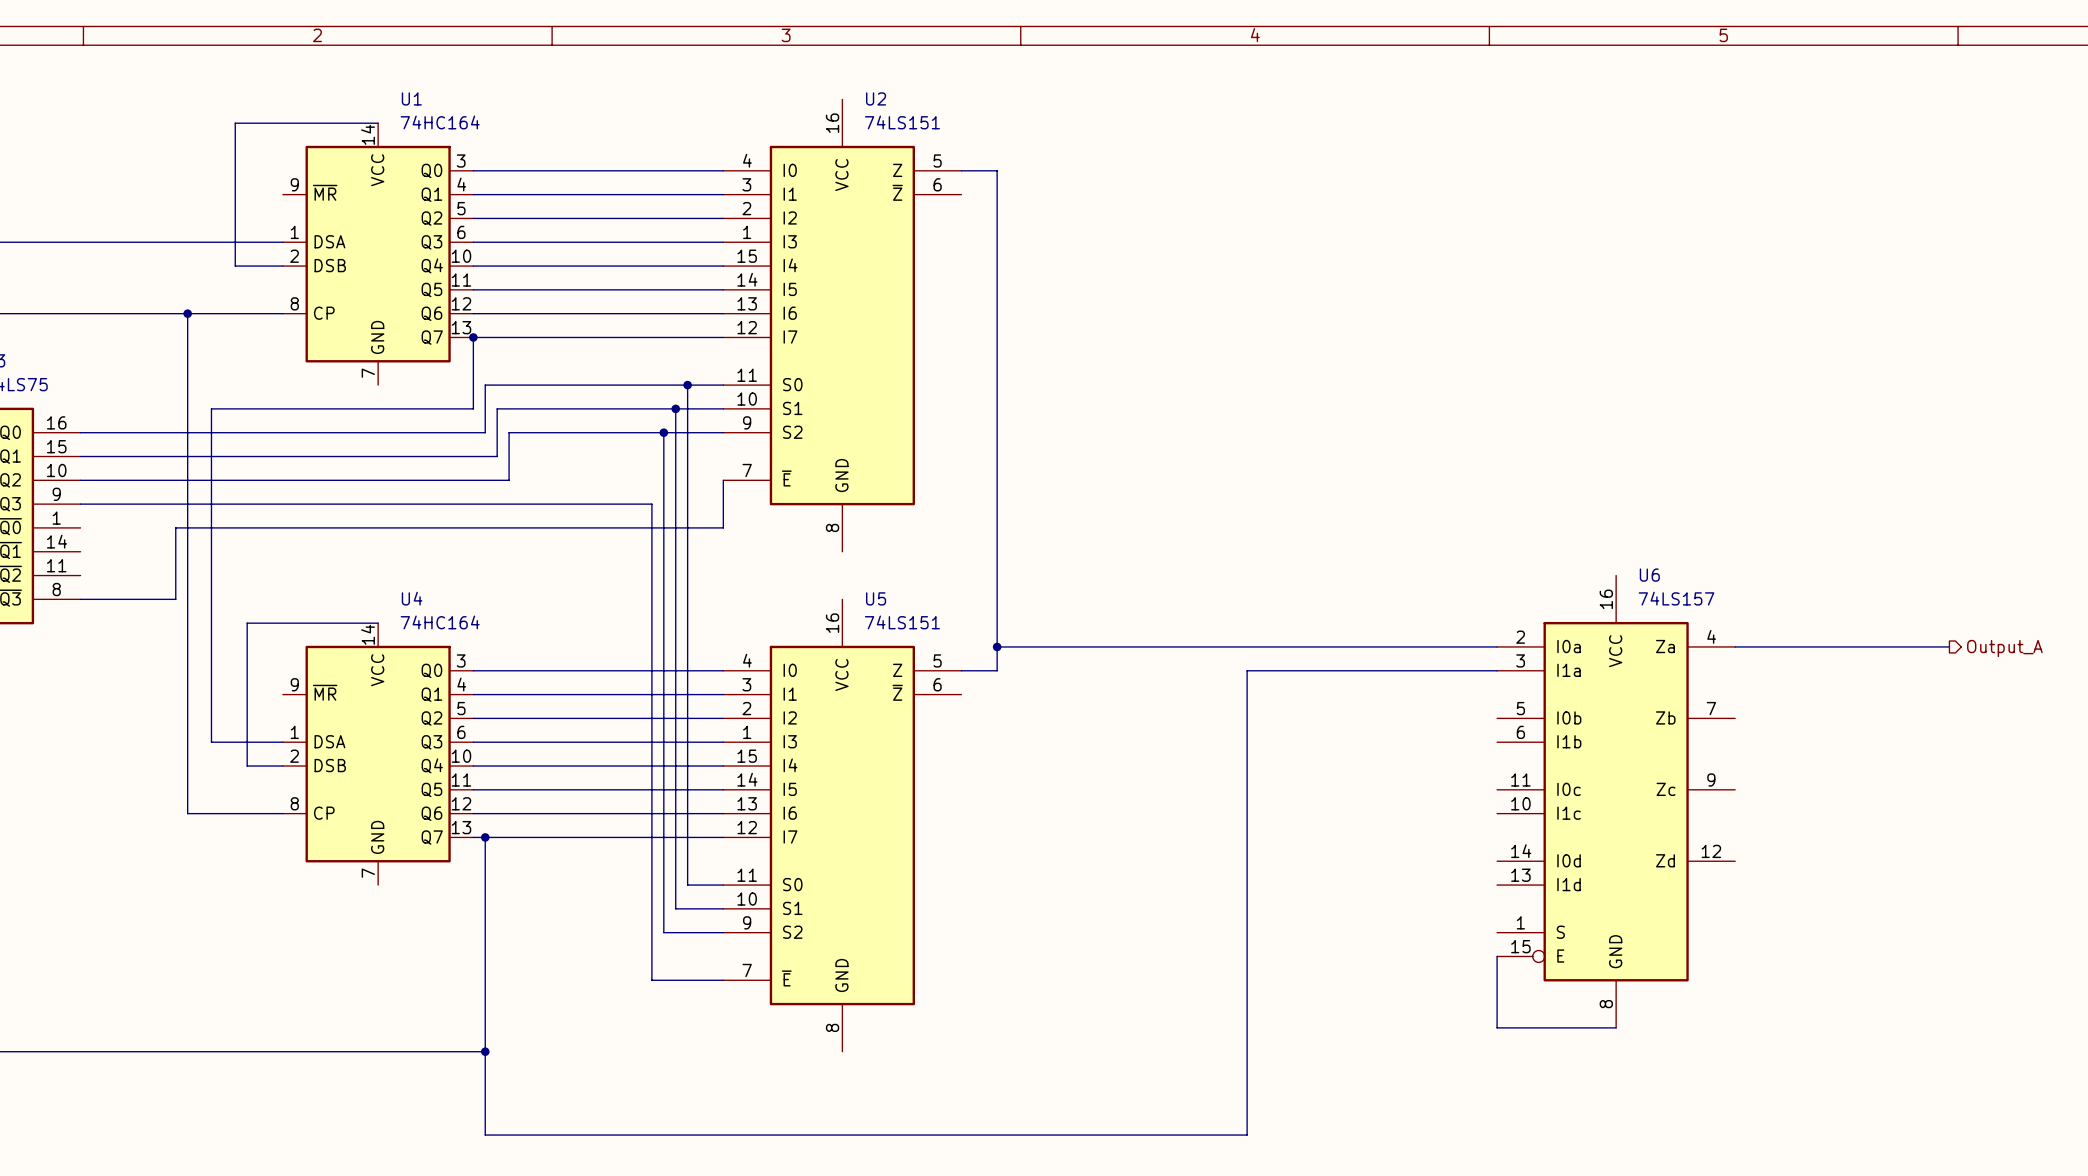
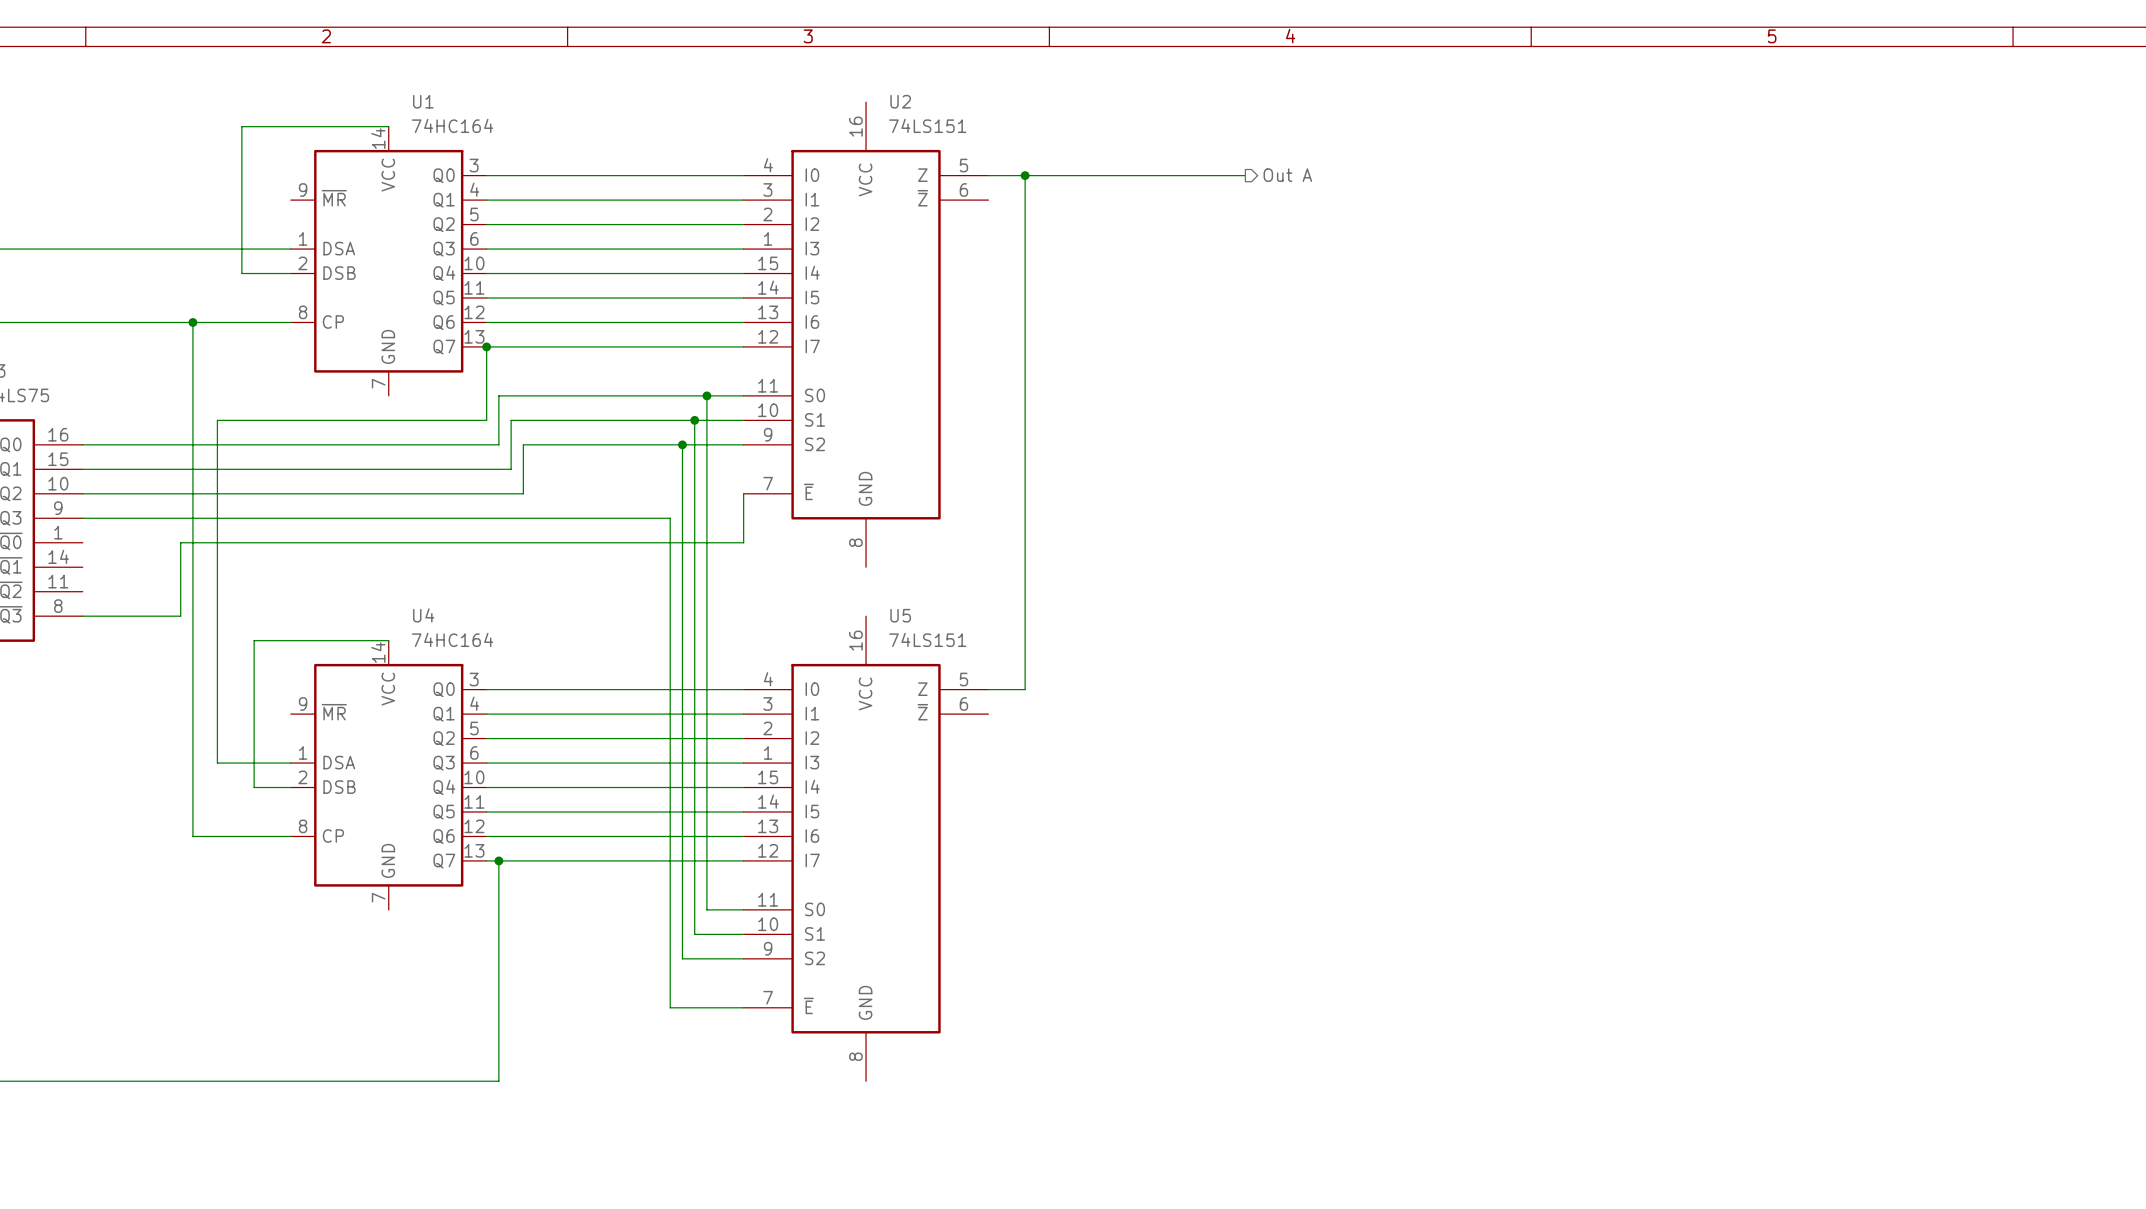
wire: none -> (1025, 175) (1245, 175)
junction: none -> (1025, 175)
hierarchical label: none -> Out A (1287, 175)
wire: (997, 646) (1497, 646) -> none
junction: (997, 646) -> none
wire: (1735, 646) (1949, 646) -> none
hierarchical label: Output_A (2004, 648) -> none
wire: (1497, 670) (1247, 670) (1247, 1135) (485, 1135) (485, 1051) -> none
U6: 74LS157 (1616, 801) -> none
wire: (1497, 956) (1497, 1027) (1616, 1027) -> none
junction: (485, 1051) -> none

